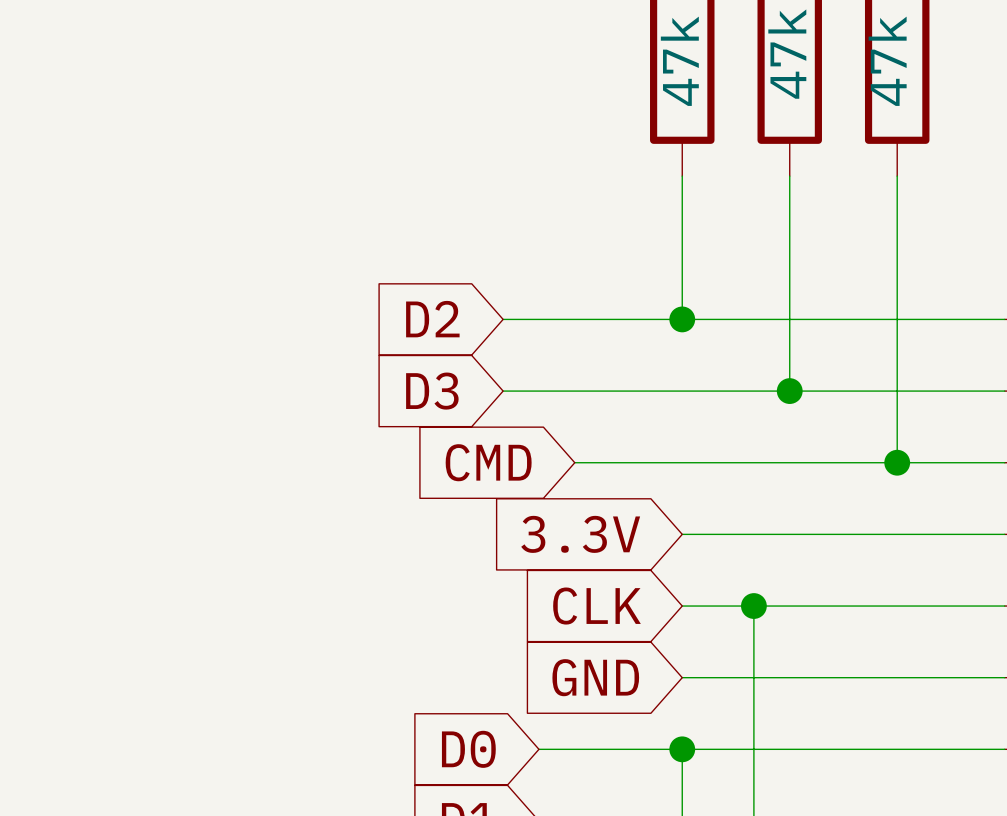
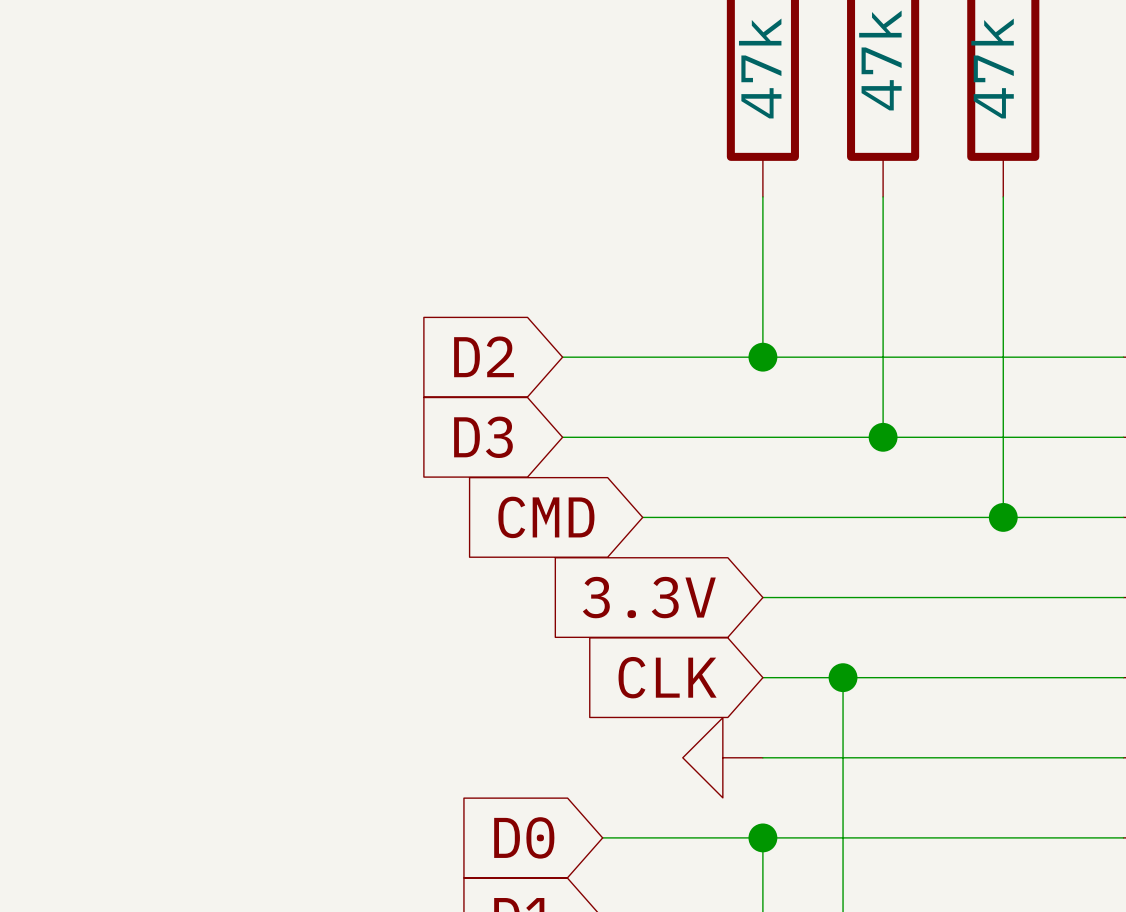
global label: GND (595, 677) -> none
power symbol: none -> (722, 757)

